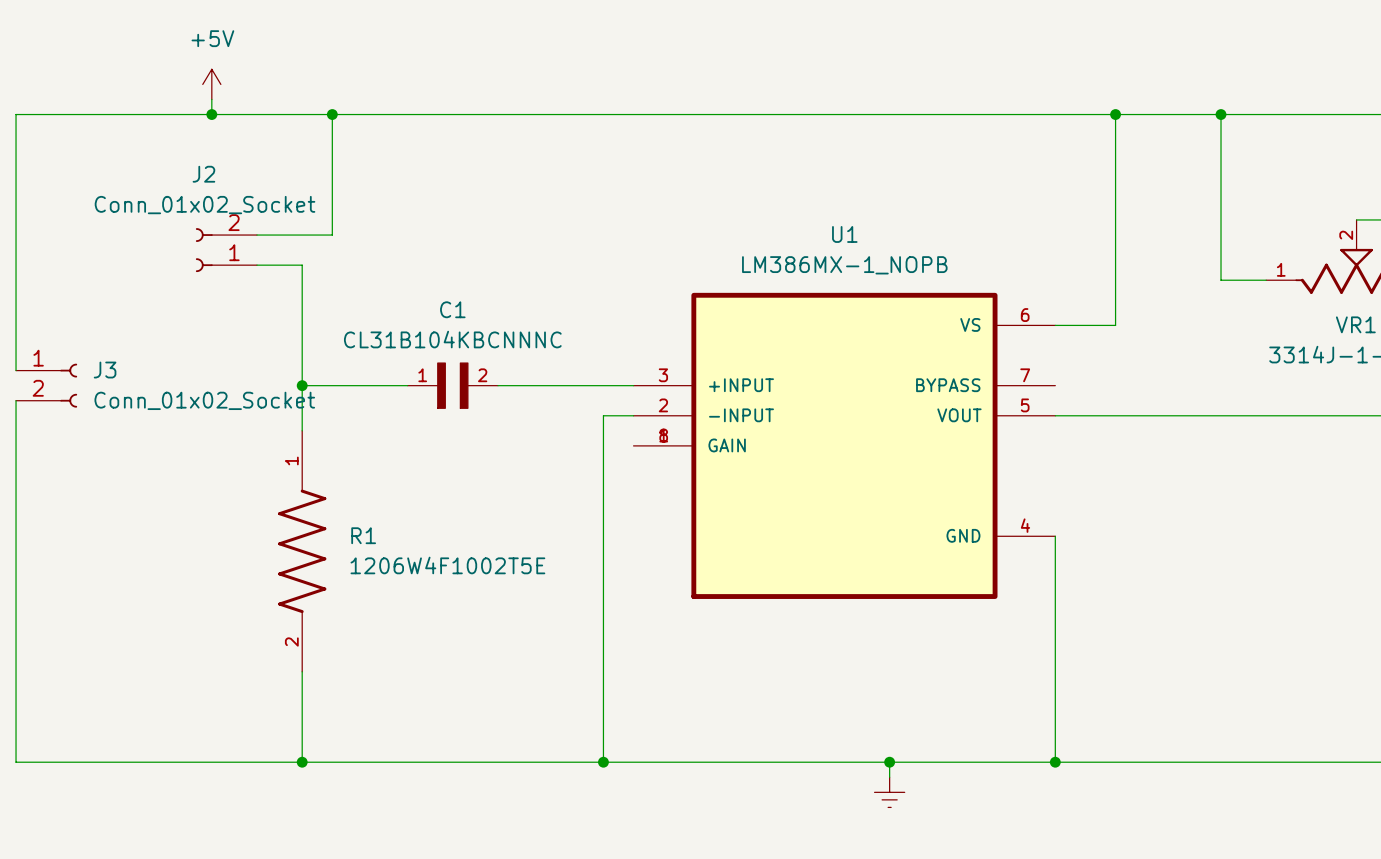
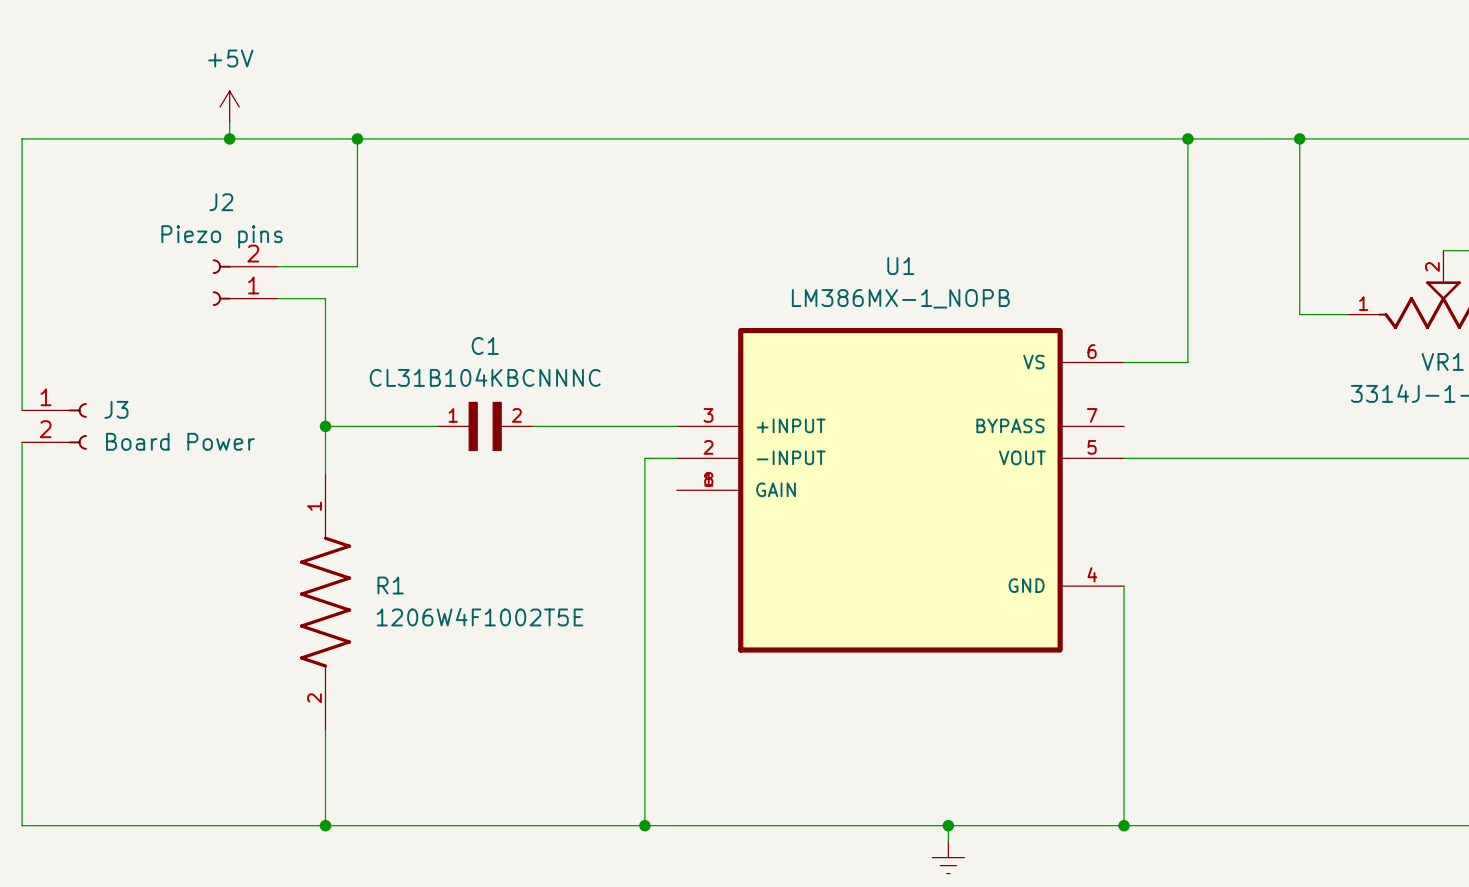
J2 value: Conn_01x02_Socket (205, 205) -> Piezo pins (222, 236)
J3 value: Conn_01x02_Socket (204, 400) -> Board Power (180, 441)

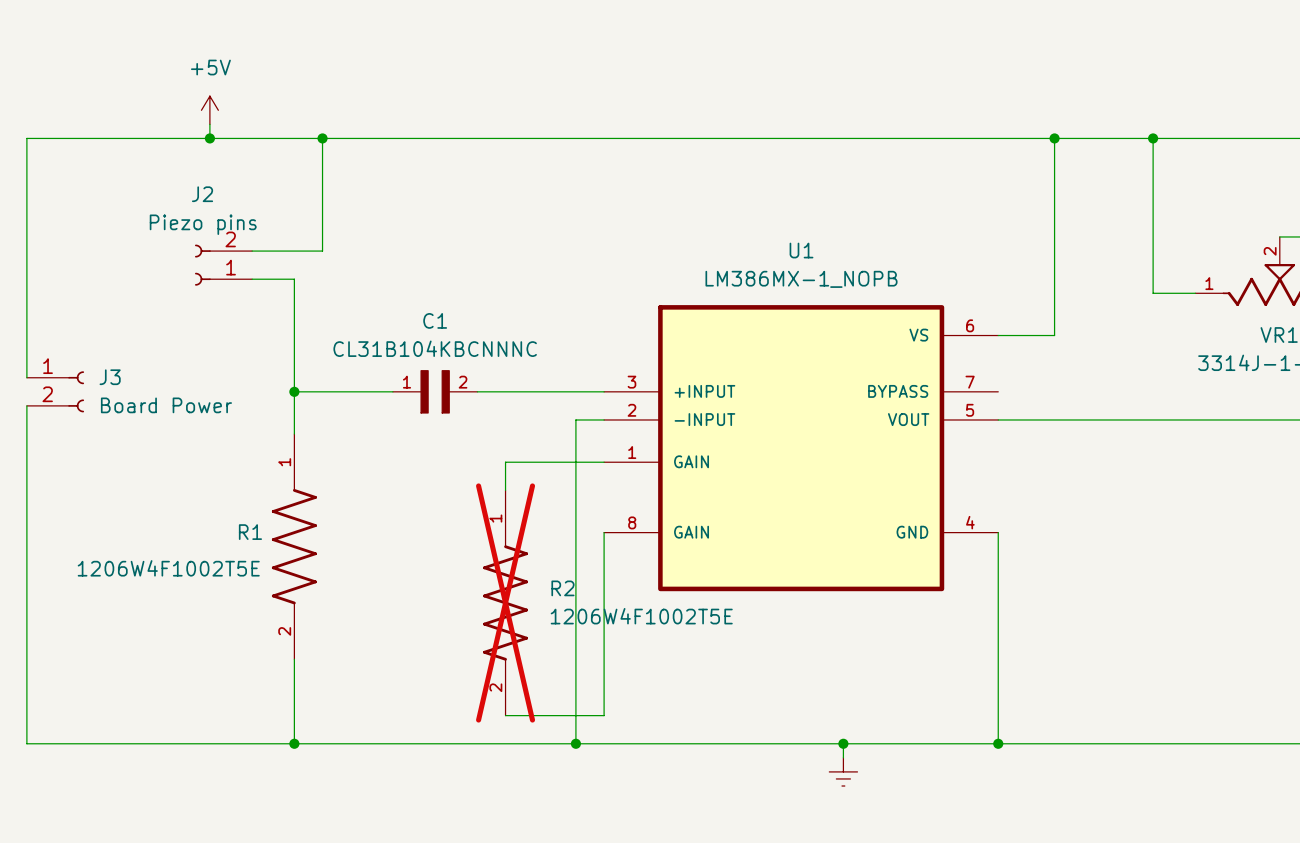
U1 symbol: [676, 328, 1125, 653] -> [604, 305, 999, 592]
wire: none -> (604, 462) (505, 462) (505, 490)
R1 name position: R1 (390, 585) -> R1 (250, 532)
wire: none -> (604, 532) (604, 715) (505, 715)
R1 value position: 1206W4F1002T5E (479, 617) -> 1206W4F1002T5E (168, 568)
R2: none -> 1206W4F1002T5E (505, 603)

